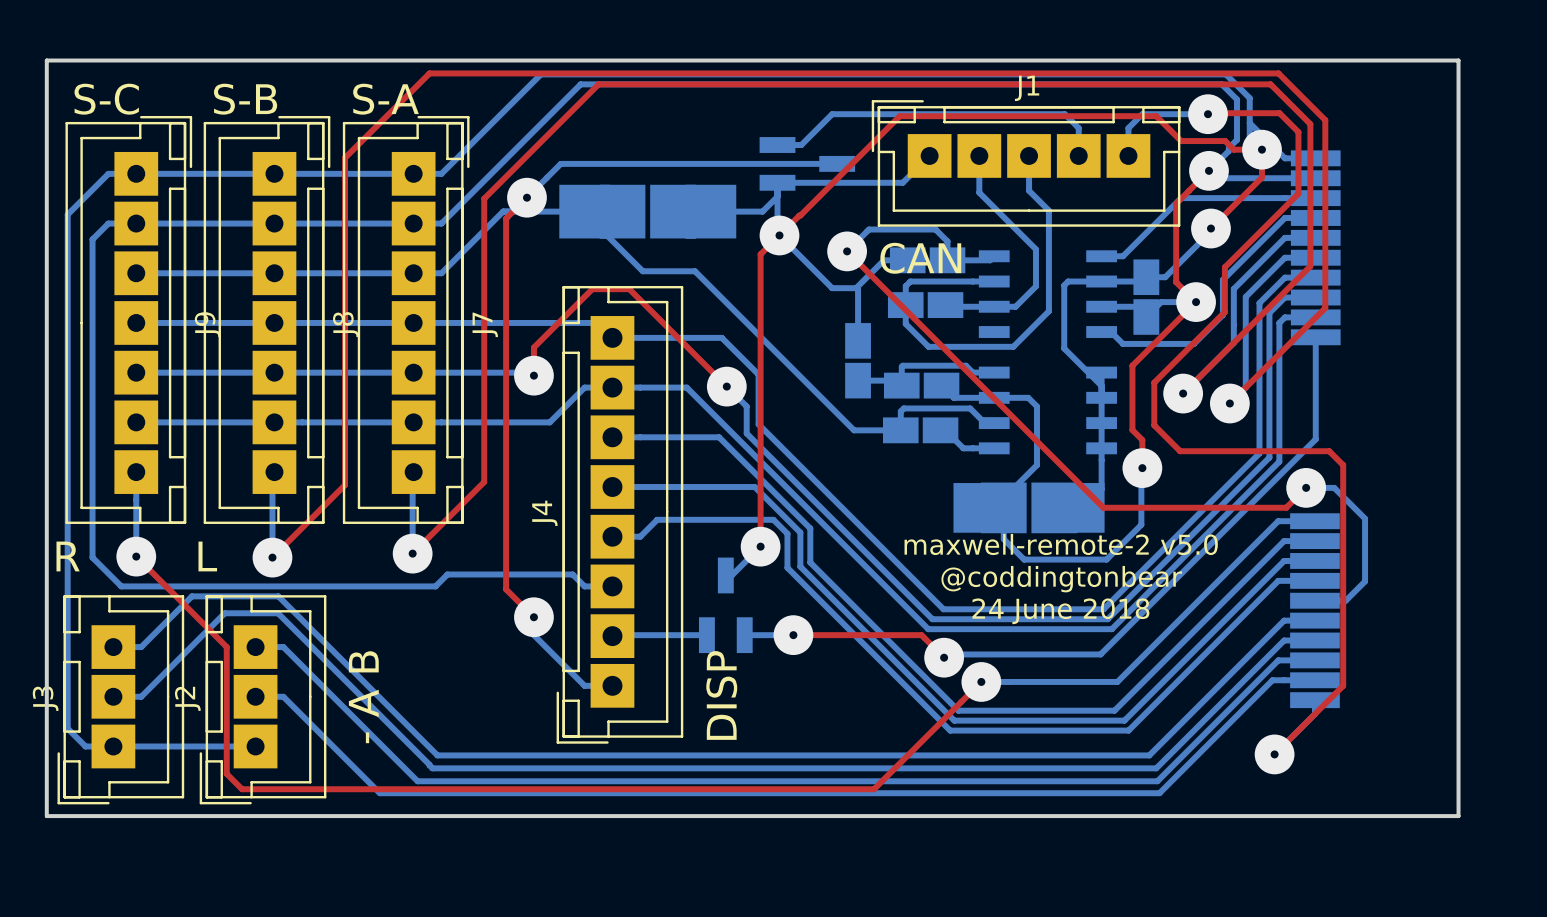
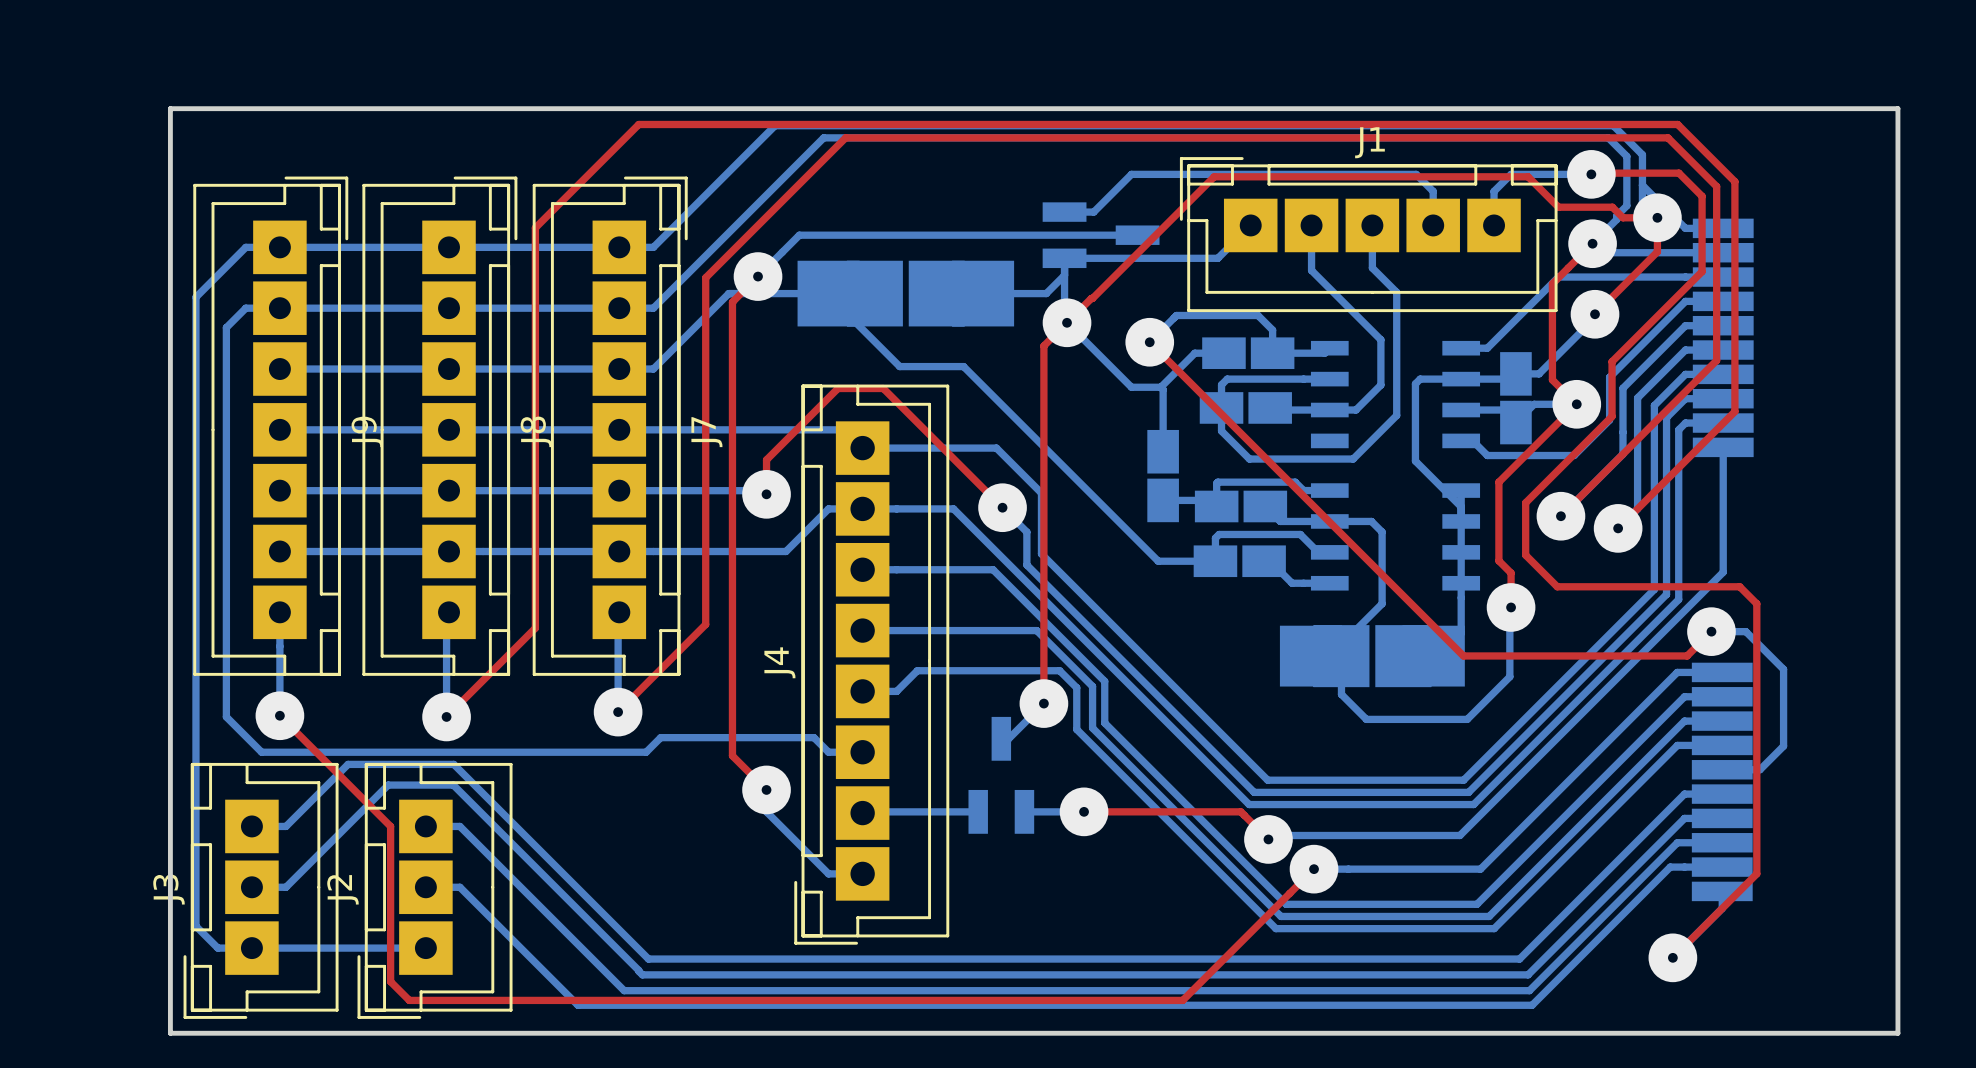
text: S-C (106, 99) -> none
text: S-B (245, 99) -> none
text: S-A (386, 99) -> none
text: CAN (920, 258) -> none
text: maxwell-remote-2 v5.0 (1061, 544) -> none
text: R (68, 556) -> none
text: L (207, 556) -> none
text: @coddingtonbear (1061, 579) -> none
text: 24 June 2018 (1060, 611) -> none
text: DISP (721, 695) -> none
text: - A B (363, 697) -> none

